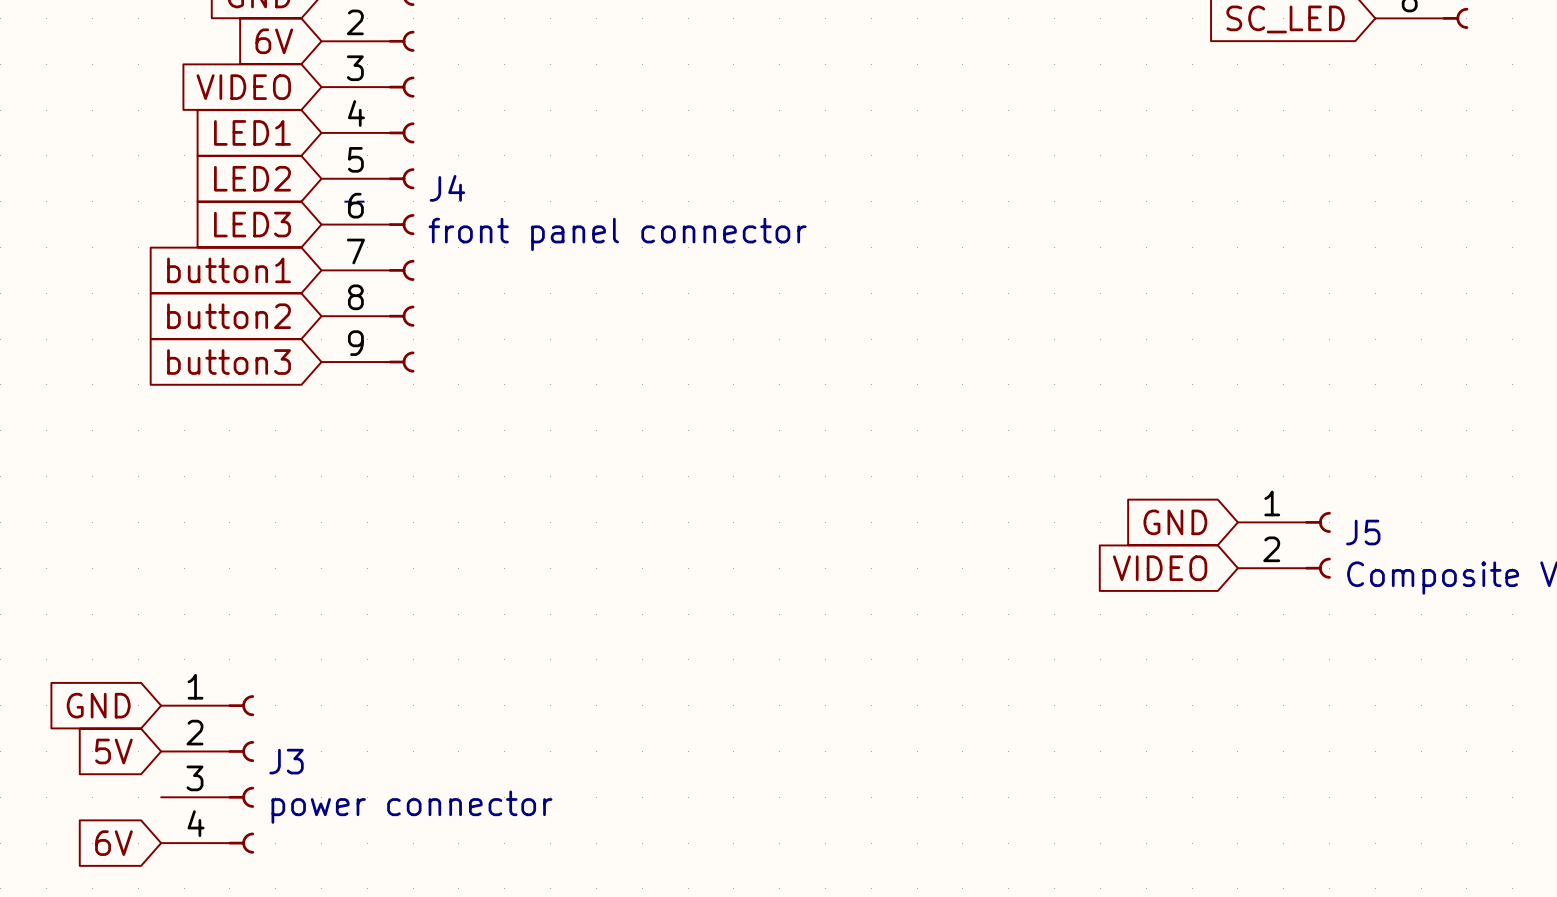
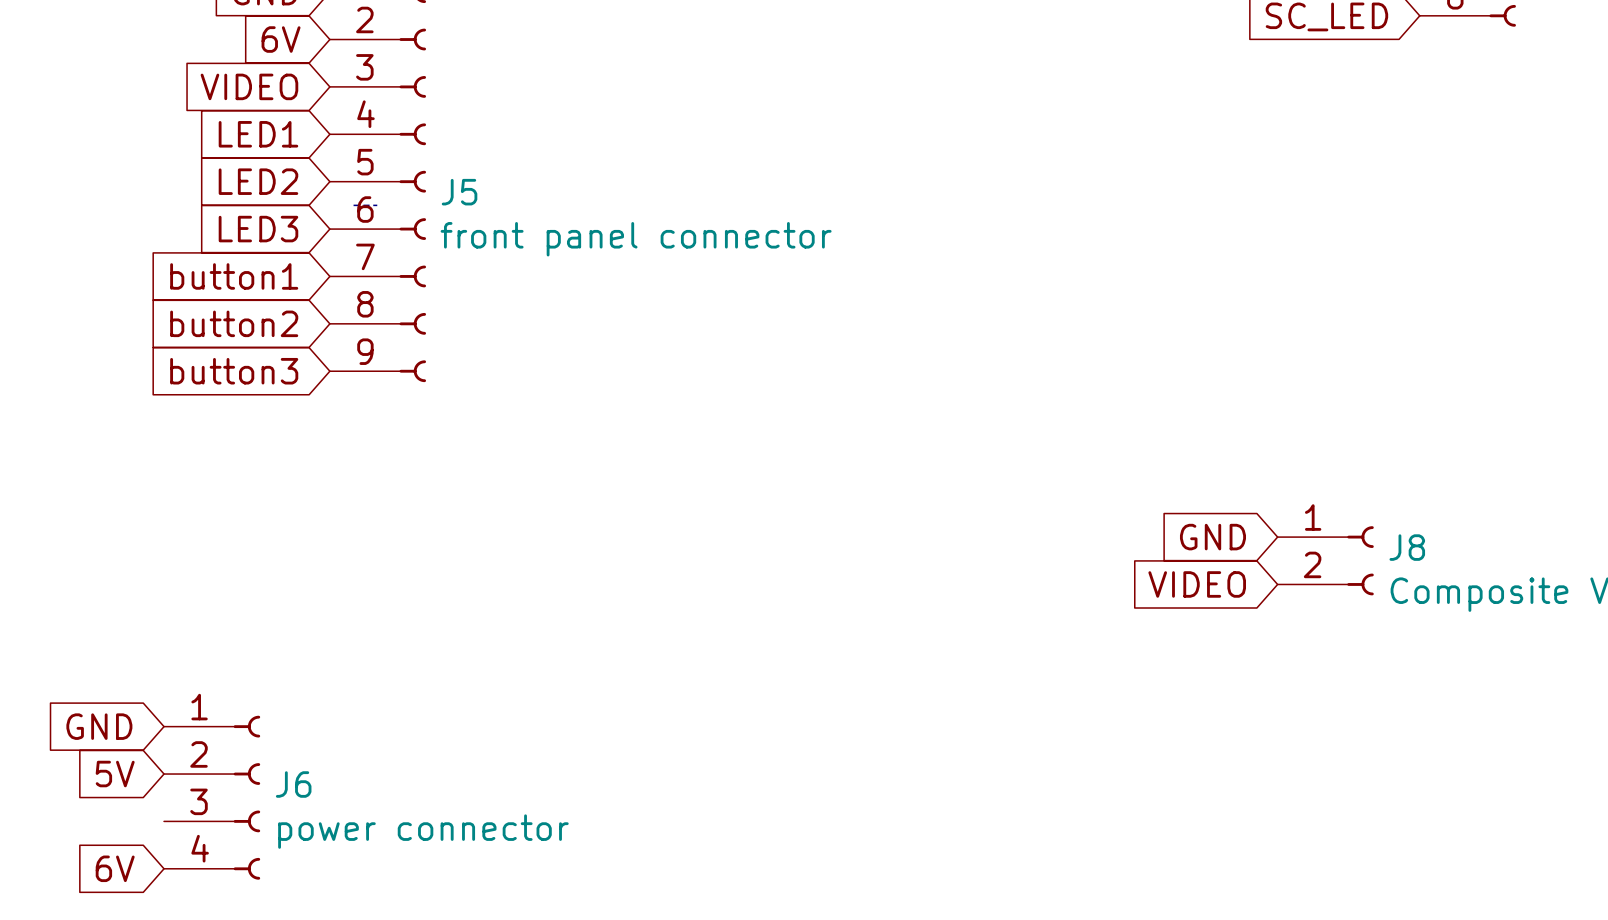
J4 name: J4 (447, 188) -> J5 (459, 192)
J5 name: J5 (1363, 532) -> J8 (1407, 547)
J3 name: J3 (286, 761) -> J6 (293, 784)

